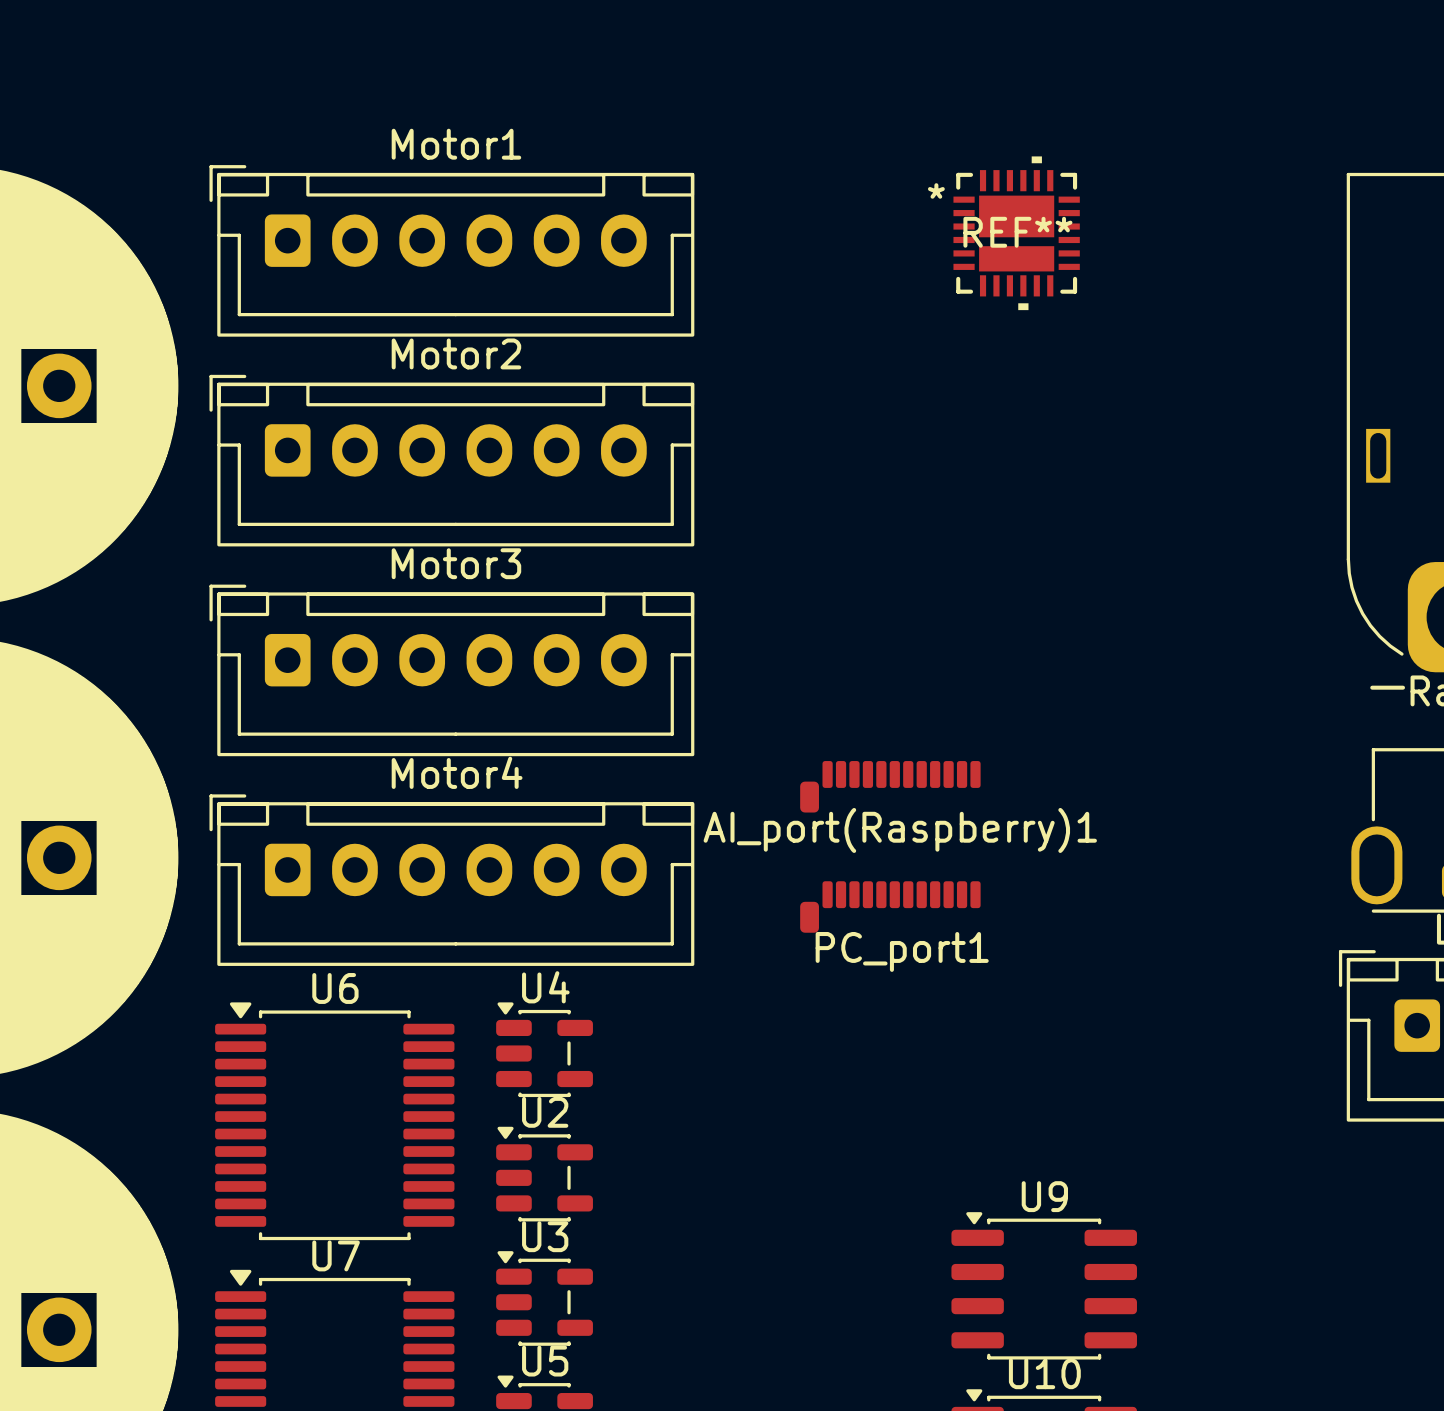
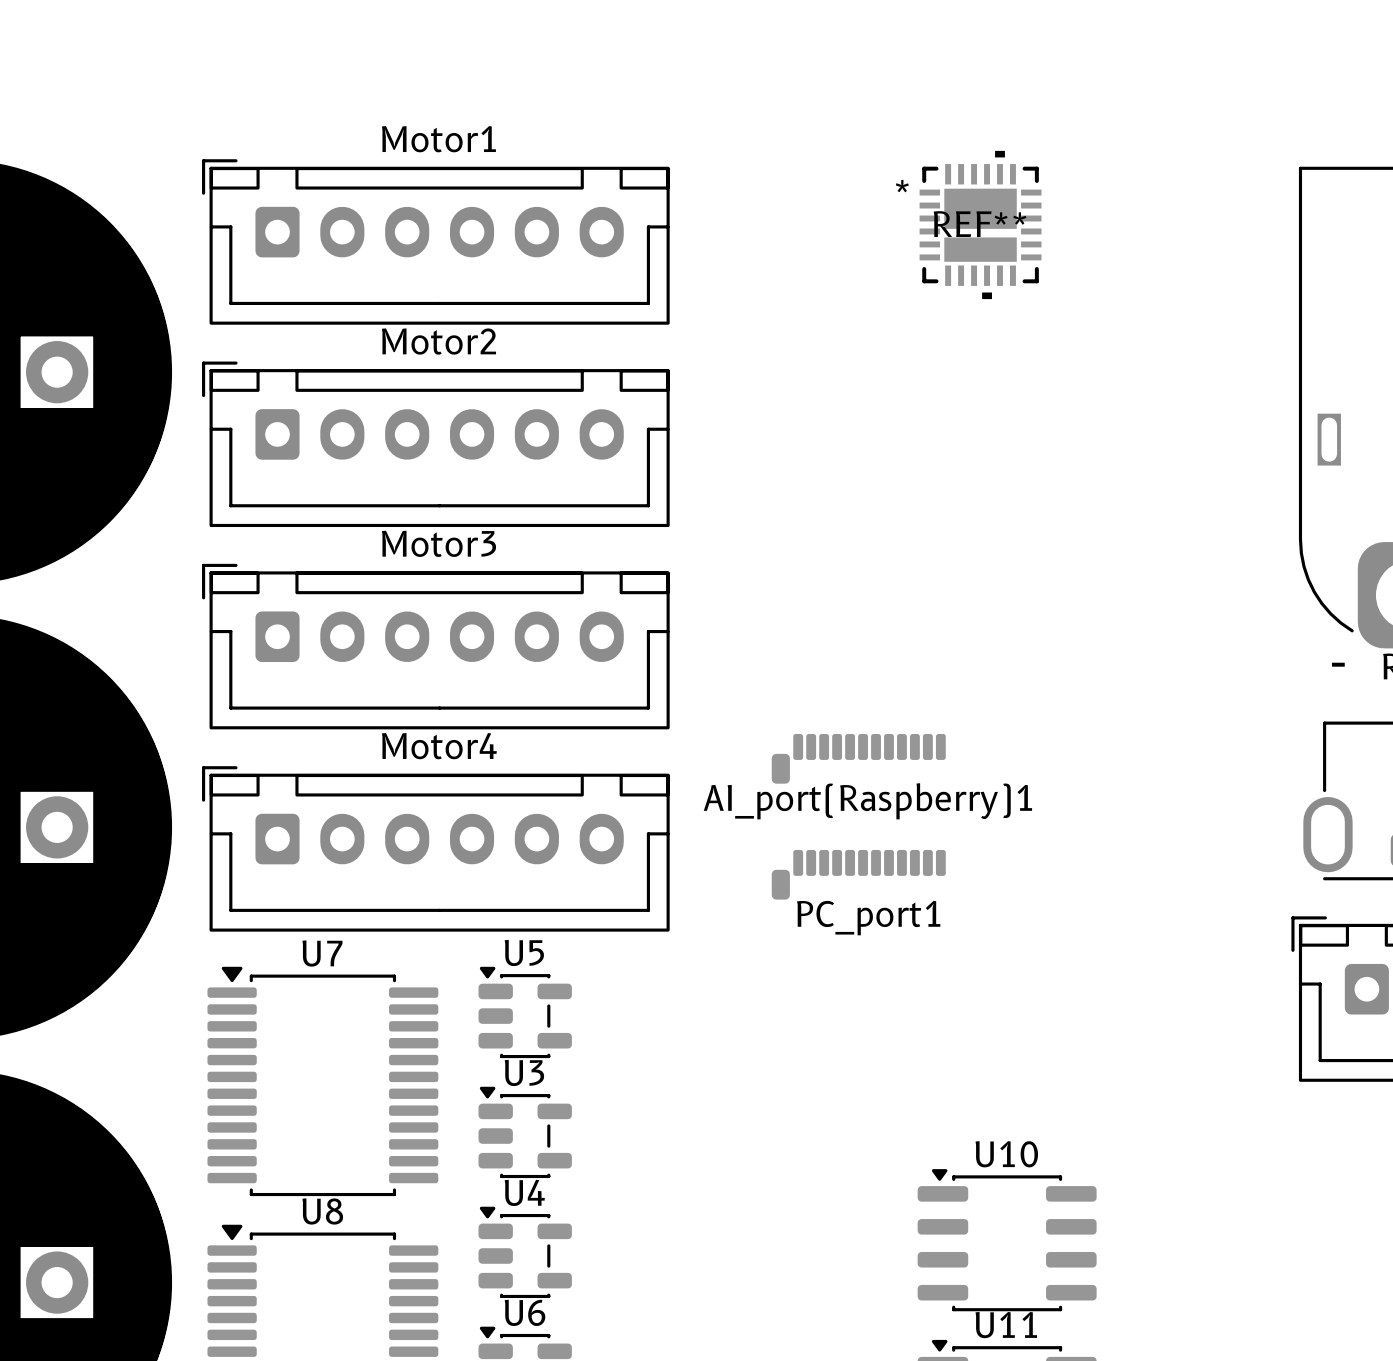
U4 name: U4 (545, 987) -> U5 (524, 953)
U6 name: U6 (335, 988) -> U7 (322, 953)
U2 name: U2 (545, 1112) -> U3 (524, 1072)
U9 name: U9 (1044, 1196) -> U10 (1006, 1154)
U3 name: U3 (545, 1236) -> U4 (524, 1192)
U7 name: U7 (336, 1255) -> U8 (322, 1211)
U5 name: U5 (545, 1361) -> U6 (525, 1312)
U10 name: U10 (1044, 1373) -> U11 (1006, 1325)

